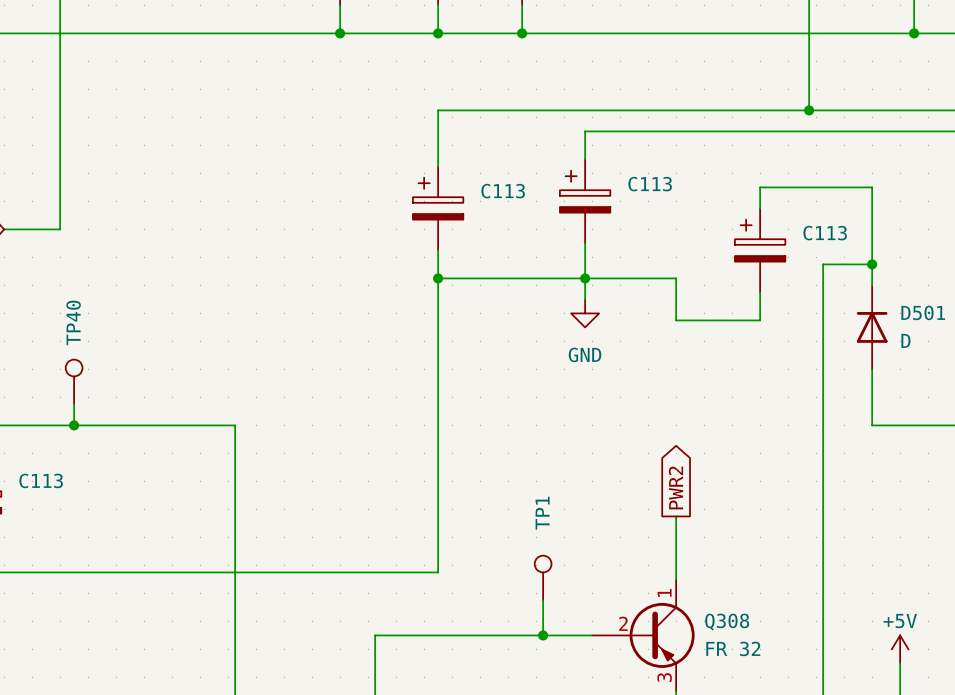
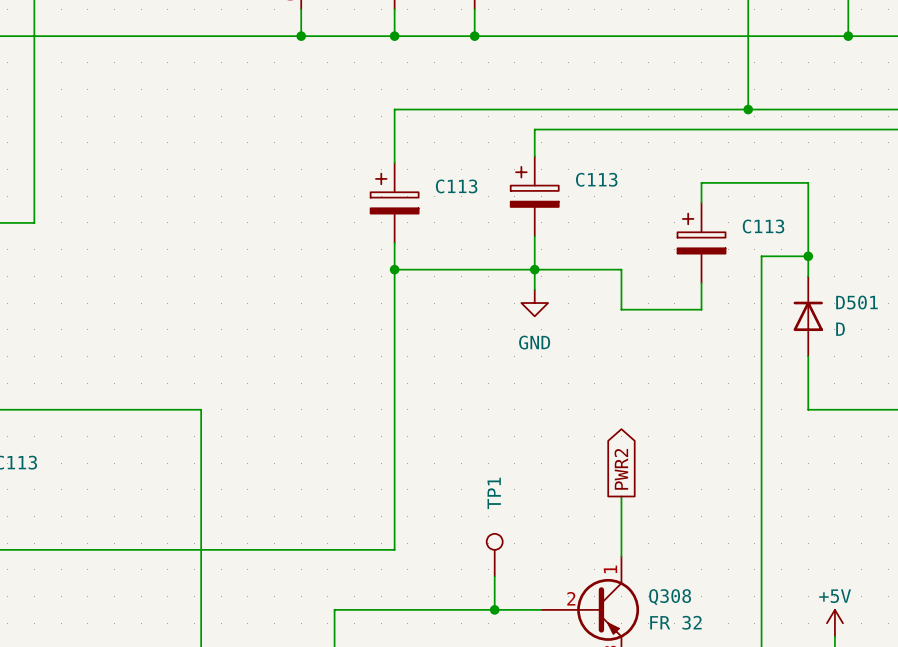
TP40: (74, 382) -> none
wire: (74, 404) (74, 425) -> none
junction: (74, 425) -> none

